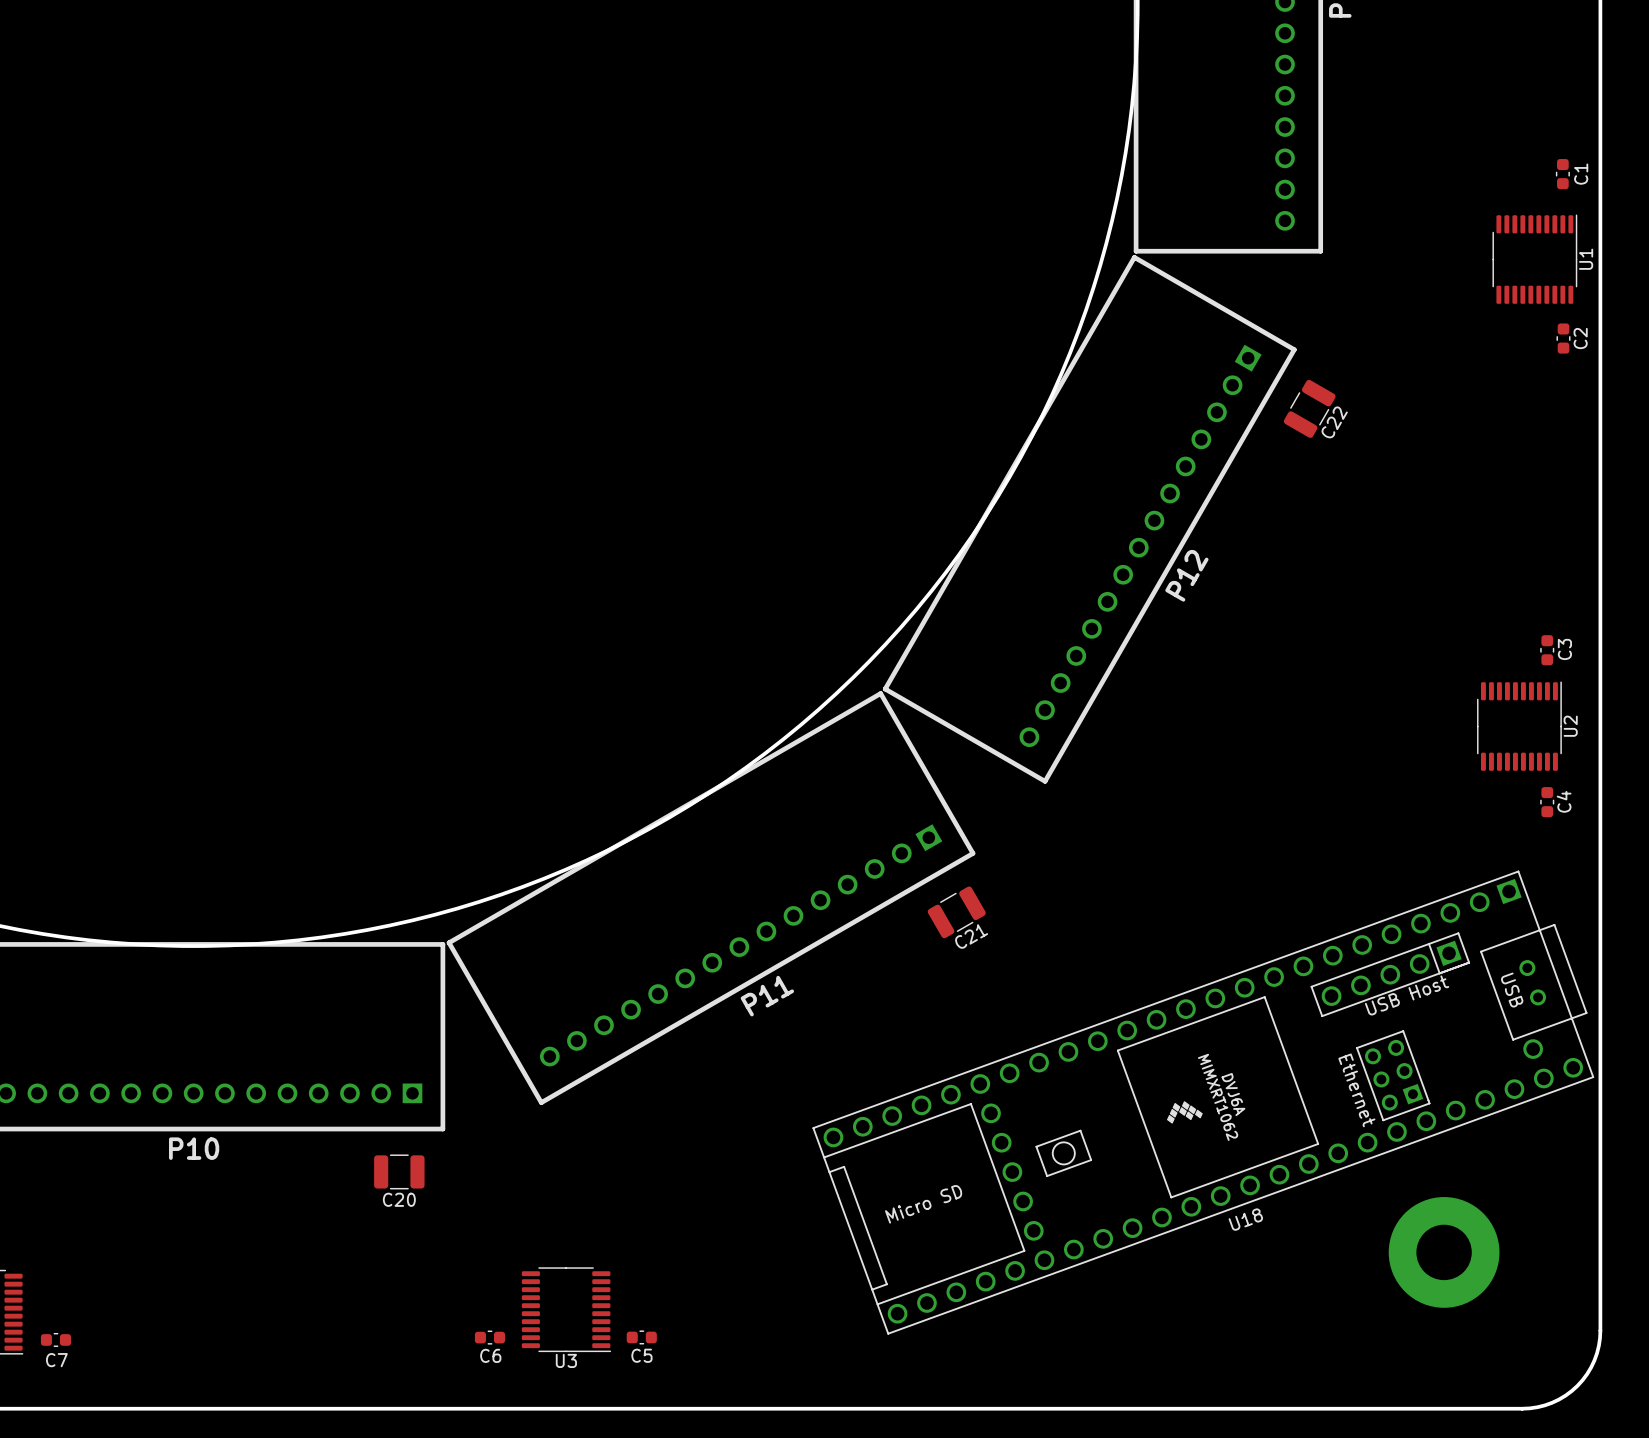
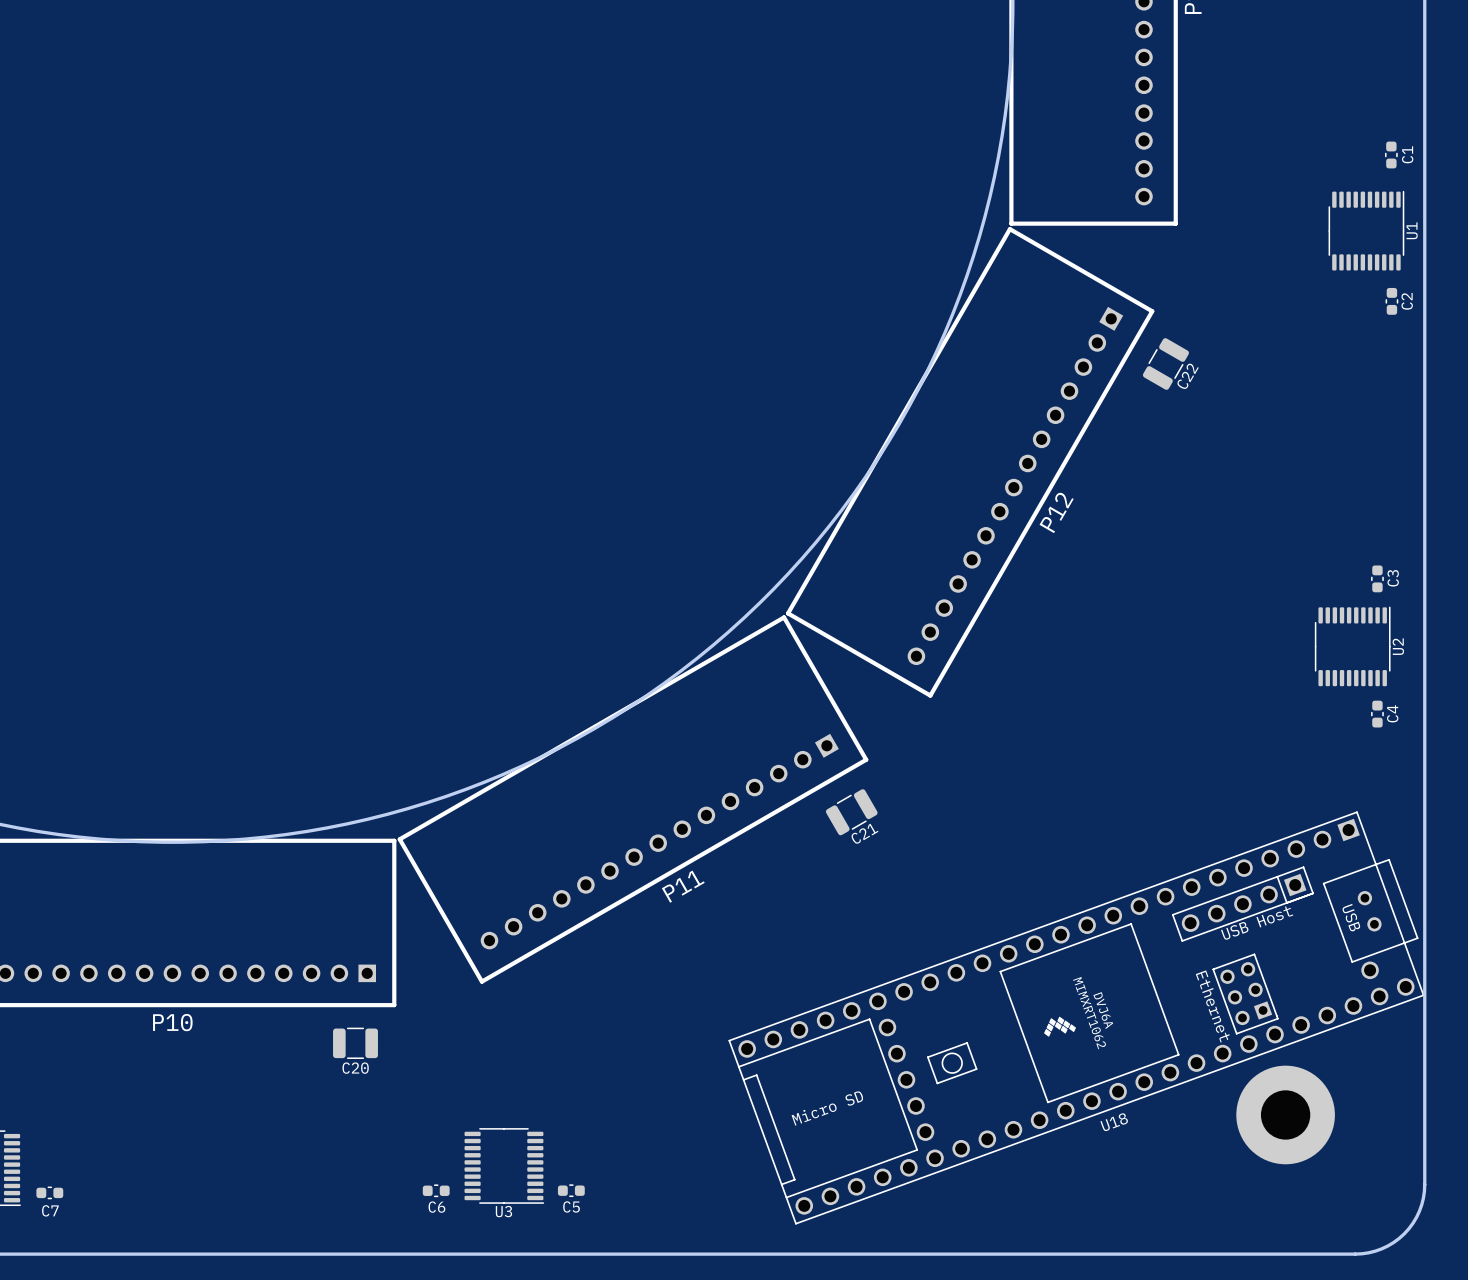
U18 position: (1203, 1102) -> (1076, 1017)

